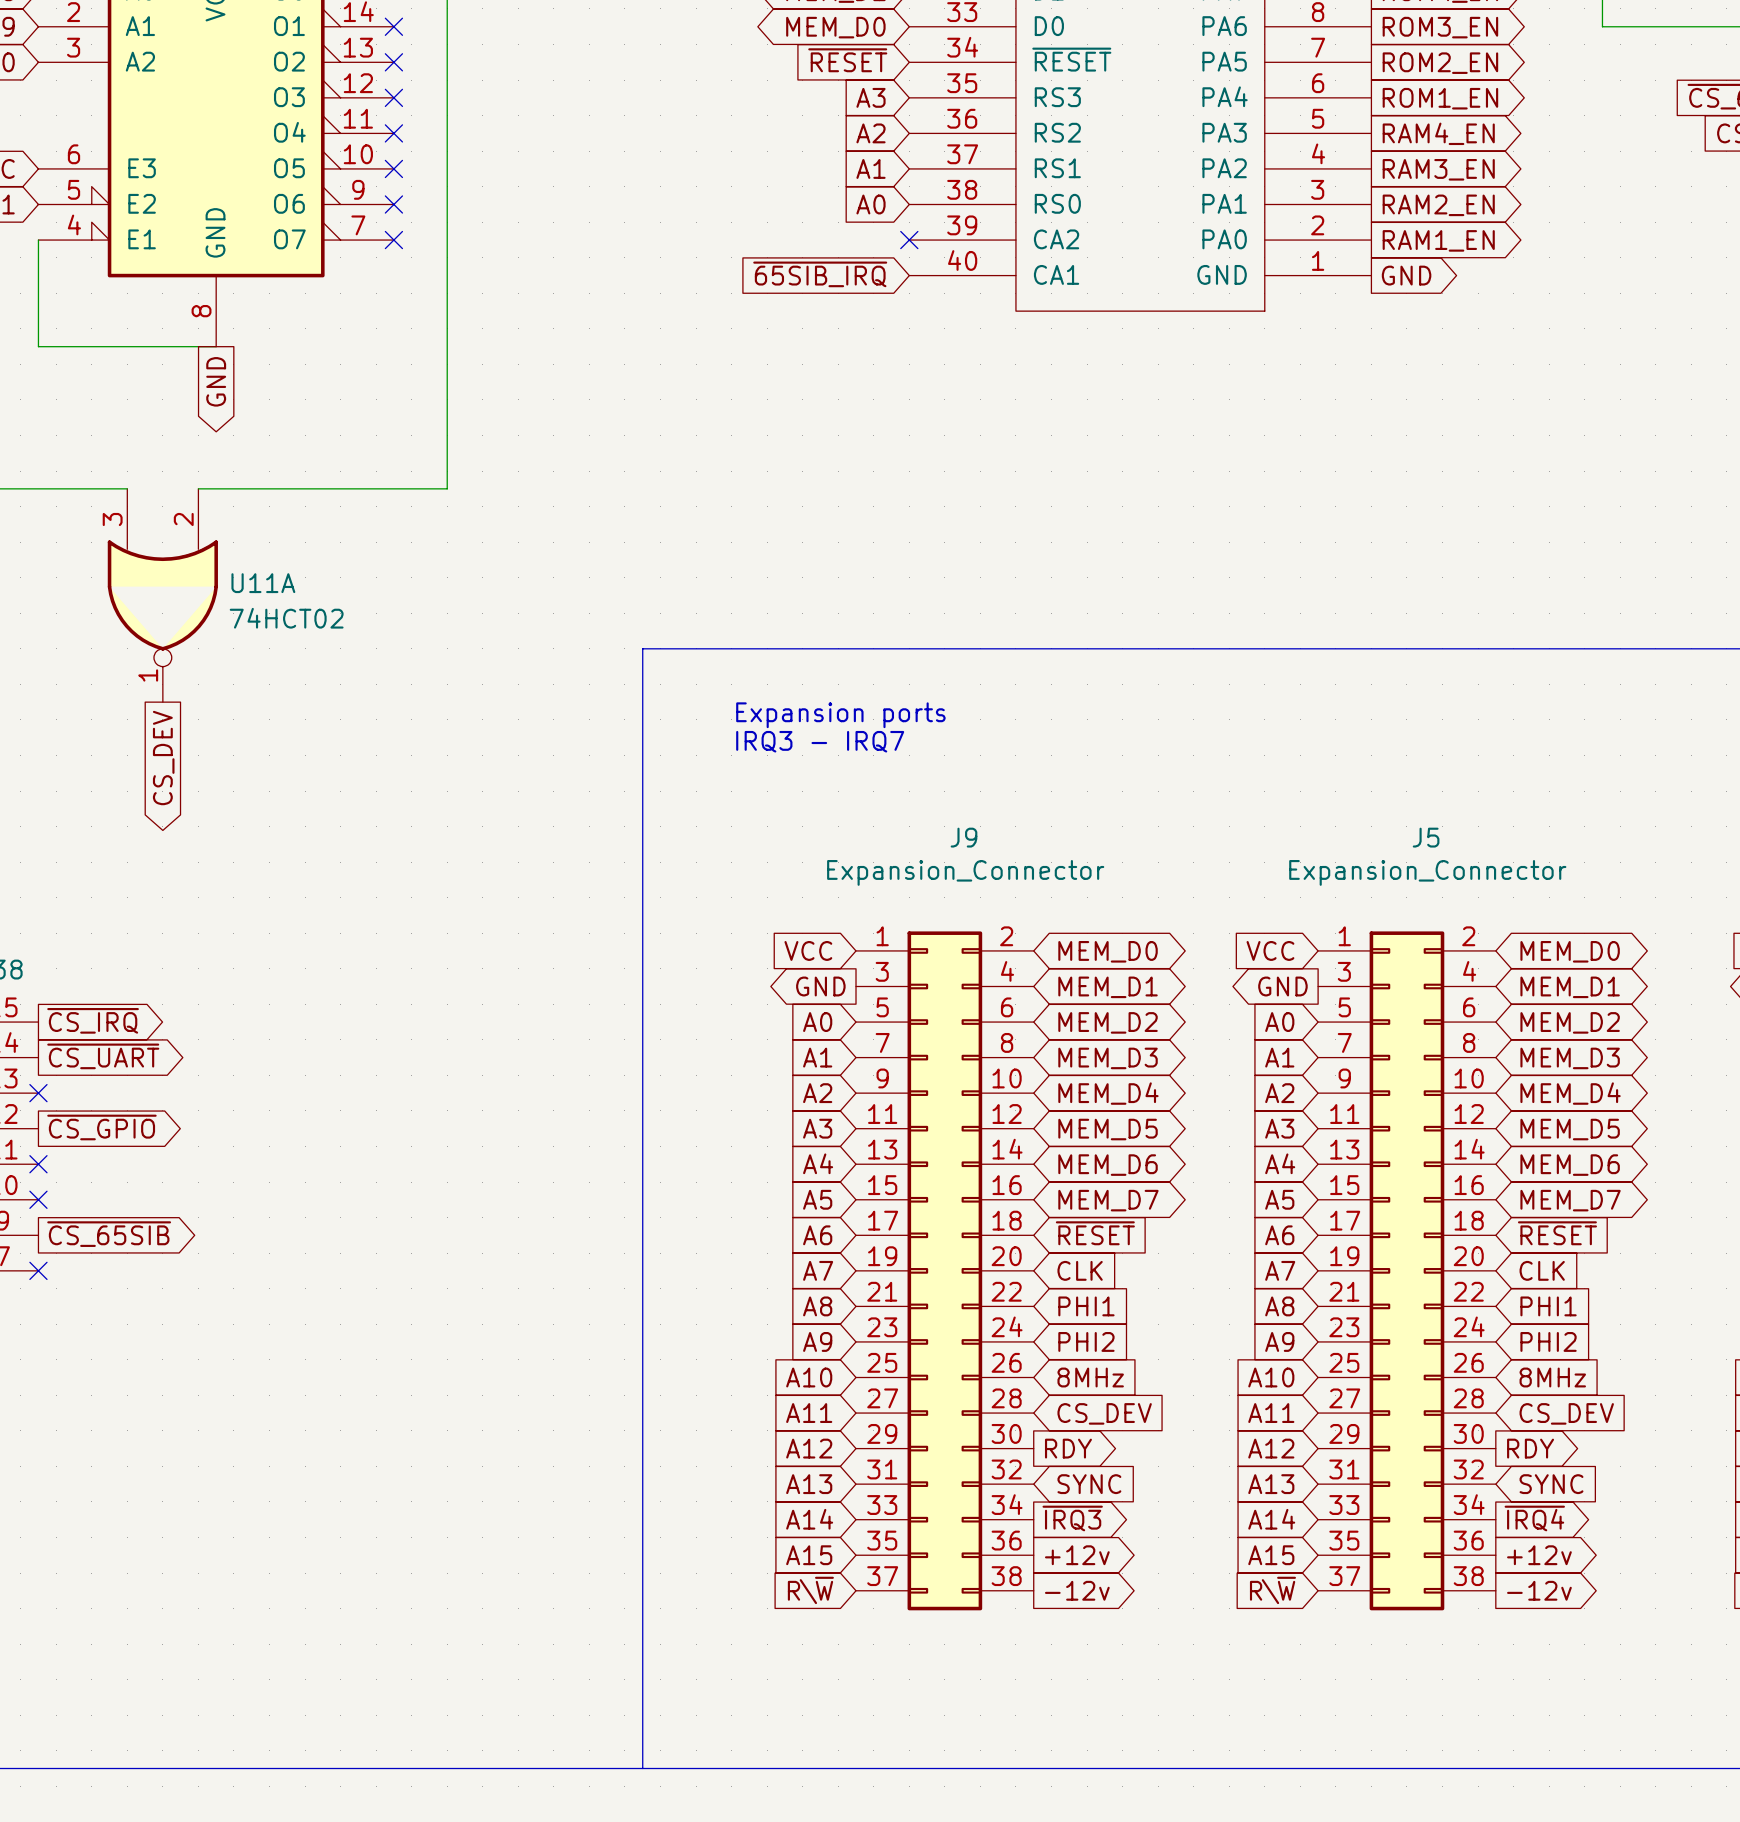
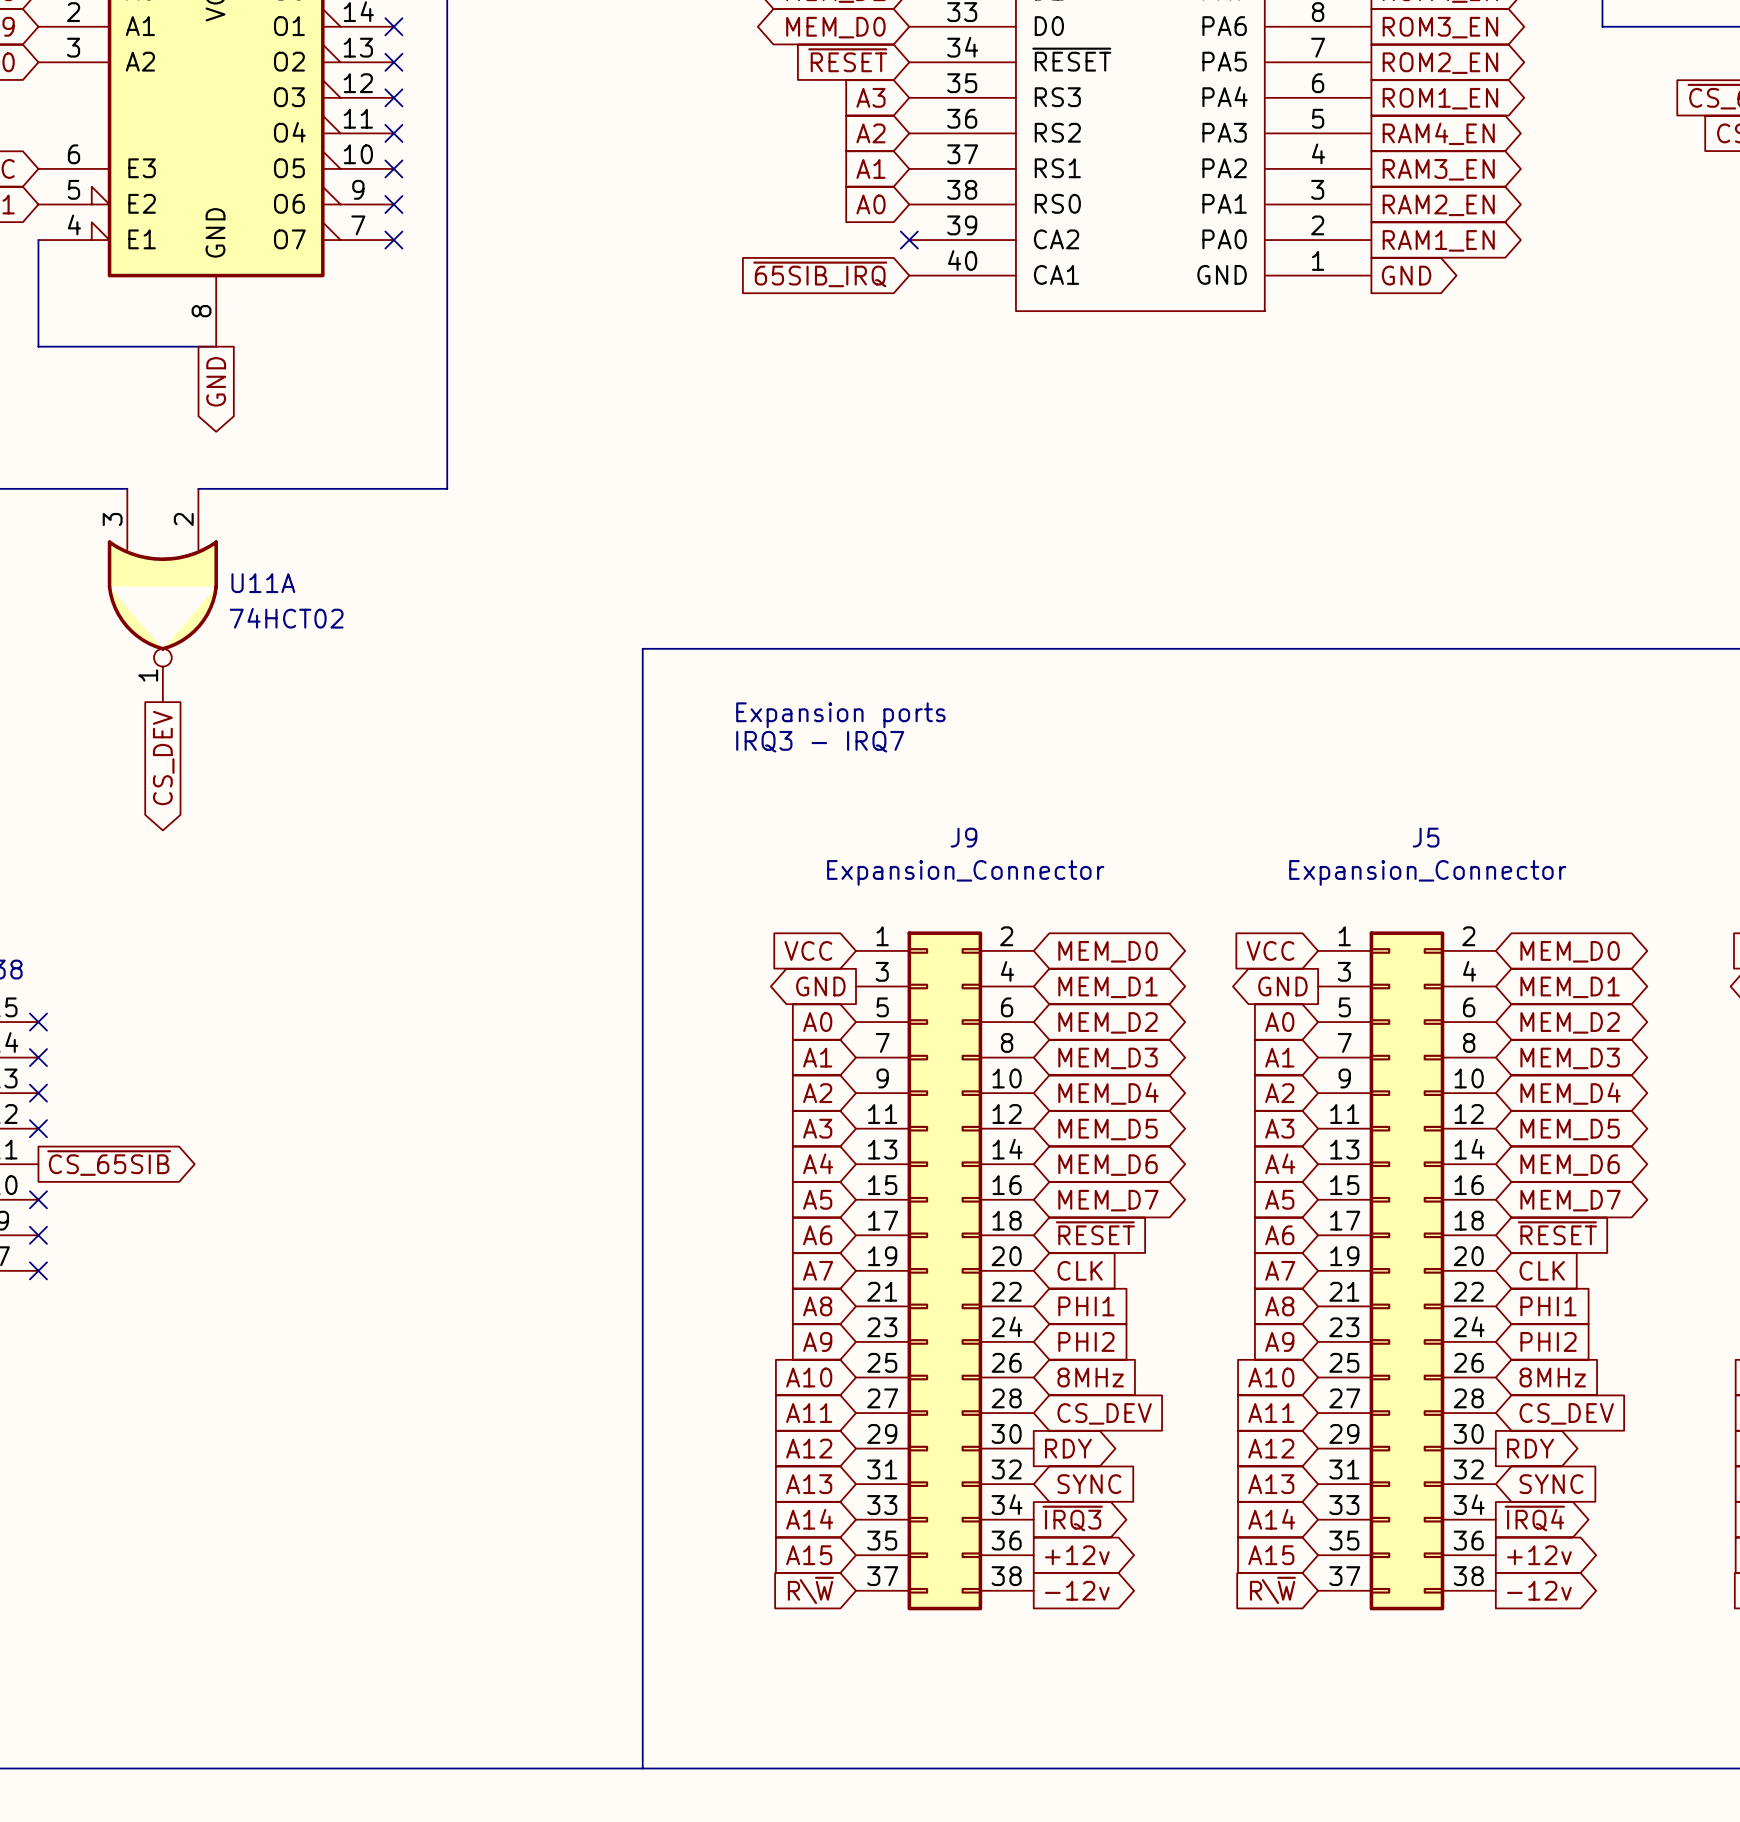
global label: ~{CS_IRQ} (93, 1020) -> none
no-connect mark: none -> (38, 1022)
global label: ~{CS_UART} (103, 1056) -> none
no-connect mark: none -> (38, 1057)
global label: ~{CS_GPIO} (101, 1127) -> none
no-connect mark: none -> (38, 1128)
no-connect mark: (38, 1164) -> none
global label position: ~{CS_65SIB} (109, 1234) -> ~{CS_65SIB} (109, 1163)
no-connect mark: none -> (38, 1235)

